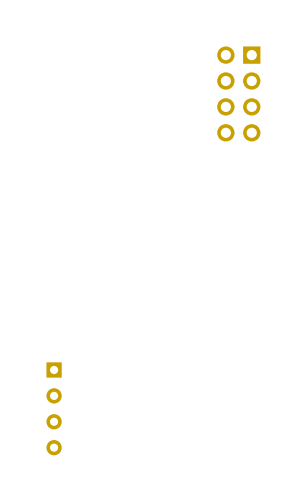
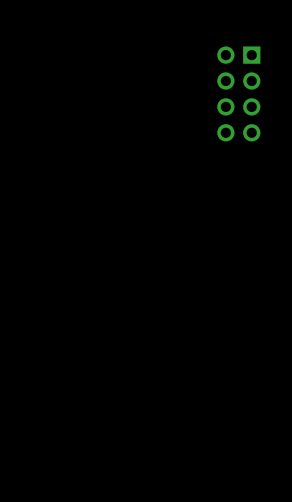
part: (54, 408) -> none

